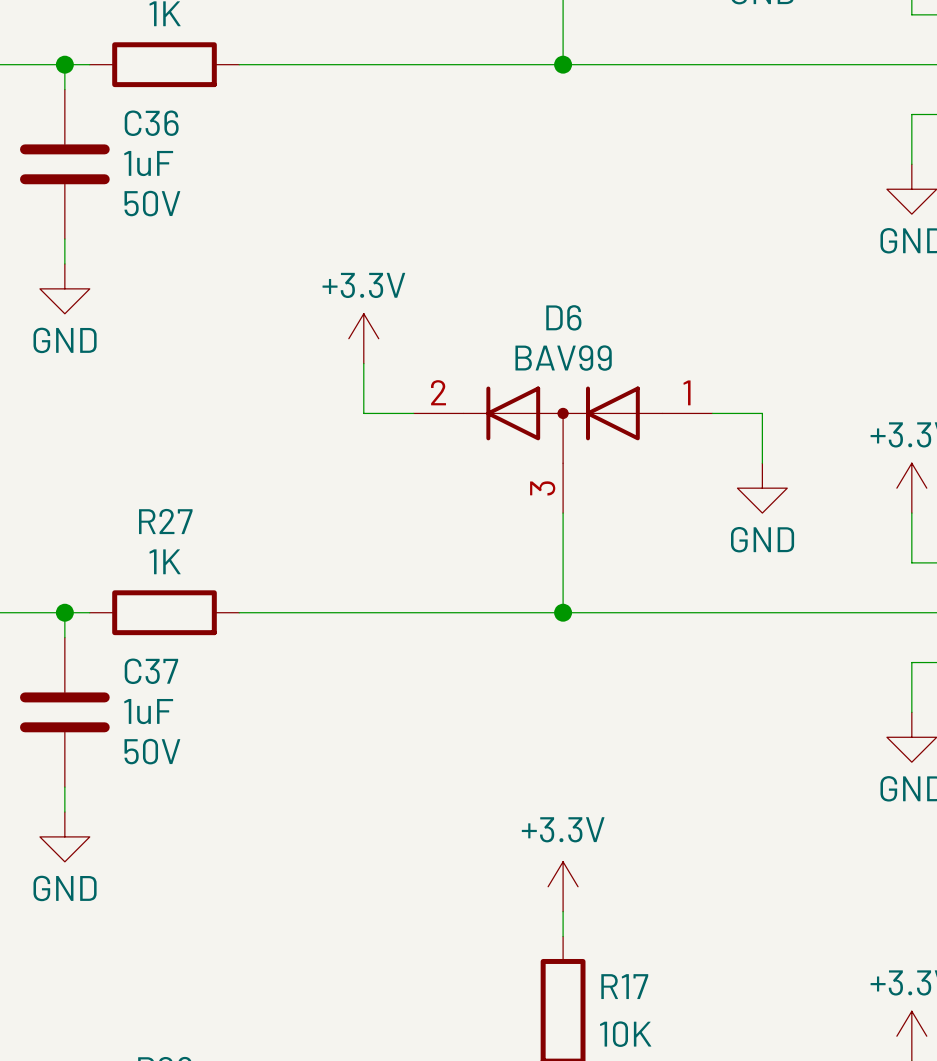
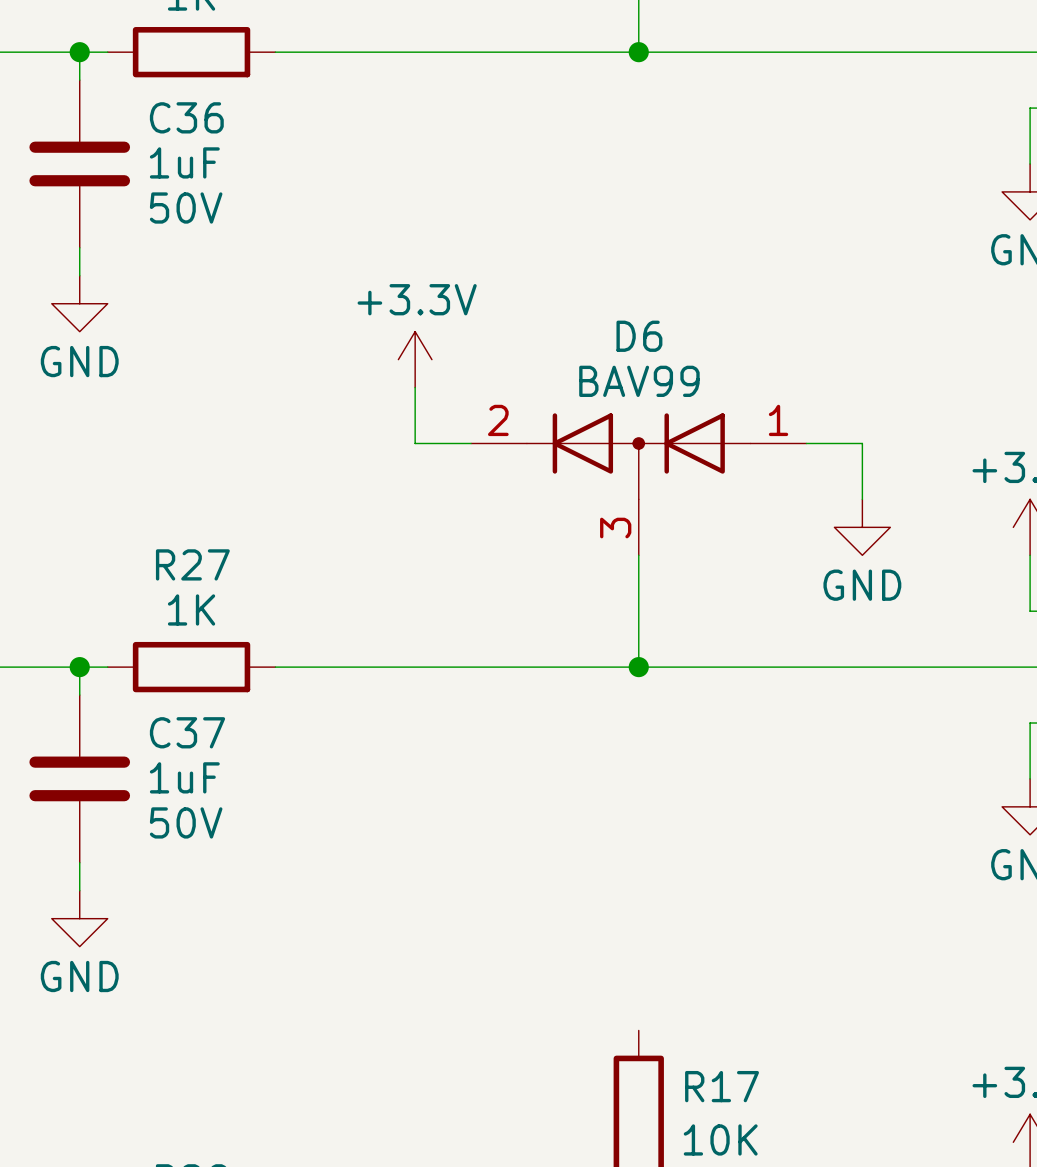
power symbol: +3.3V (563, 886) -> none
wire: (563, 911) (563, 936) -> none

